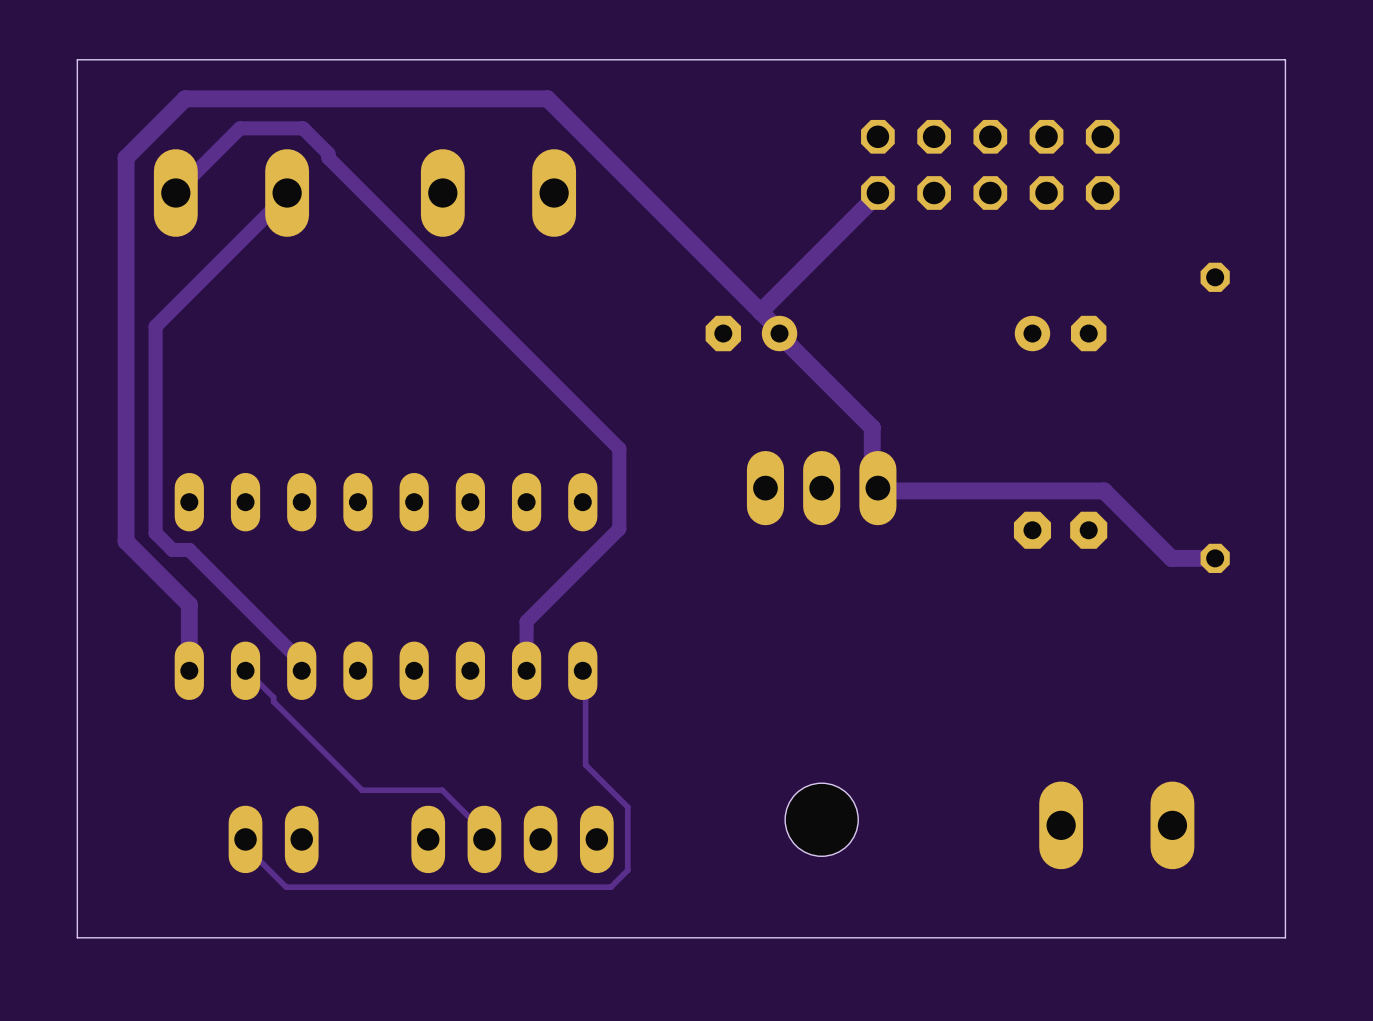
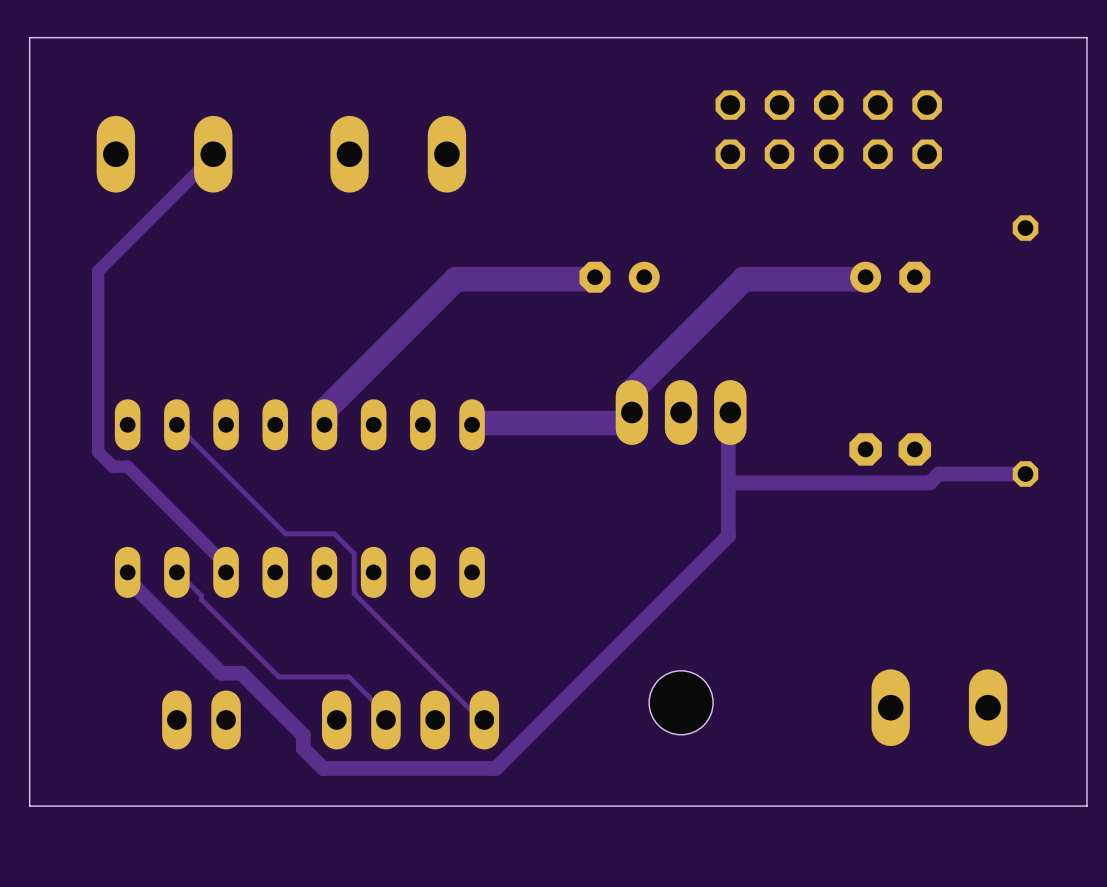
track: (175, 193) (239, 128) (303, 128) (328, 153) (328, 157) (619, 448) (619, 528) (526, 621) (526, 670) -> none
track: (877, 193) (760, 311) -> none
track: none -> (595, 277) (593, 279) (456, 279) (325, 409) (324, 424)
track: none -> (865, 277) (865, 279) (743, 279) (635, 387) (635, 400) (631, 412) (622, 423) (473, 423) (472, 424)
track: none -> (176, 424) (285, 533) (334, 533) (354, 553) (354, 593) (482, 721) (484, 719)
track: (1171, 558) (1104, 490) (880, 490) (872, 482) (872, 427) (783, 339) (779, 330) (547, 98) (185, 98) (126, 157) (126, 541) (189, 604) (189, 670) -> (730, 412) (728, 414) (728, 536) (495, 768) (323, 768) (303, 748) (303, 735) (241, 673) (221, 673) (128, 580) (127, 572)
track: none -> (987, 474) (938, 474) (929, 482) (728, 482)
track: (582, 670) (585, 672) (585, 764) (627, 807) (627, 870) (610, 887) (286, 887) (248, 849) (248, 840) (245, 839) -> none

